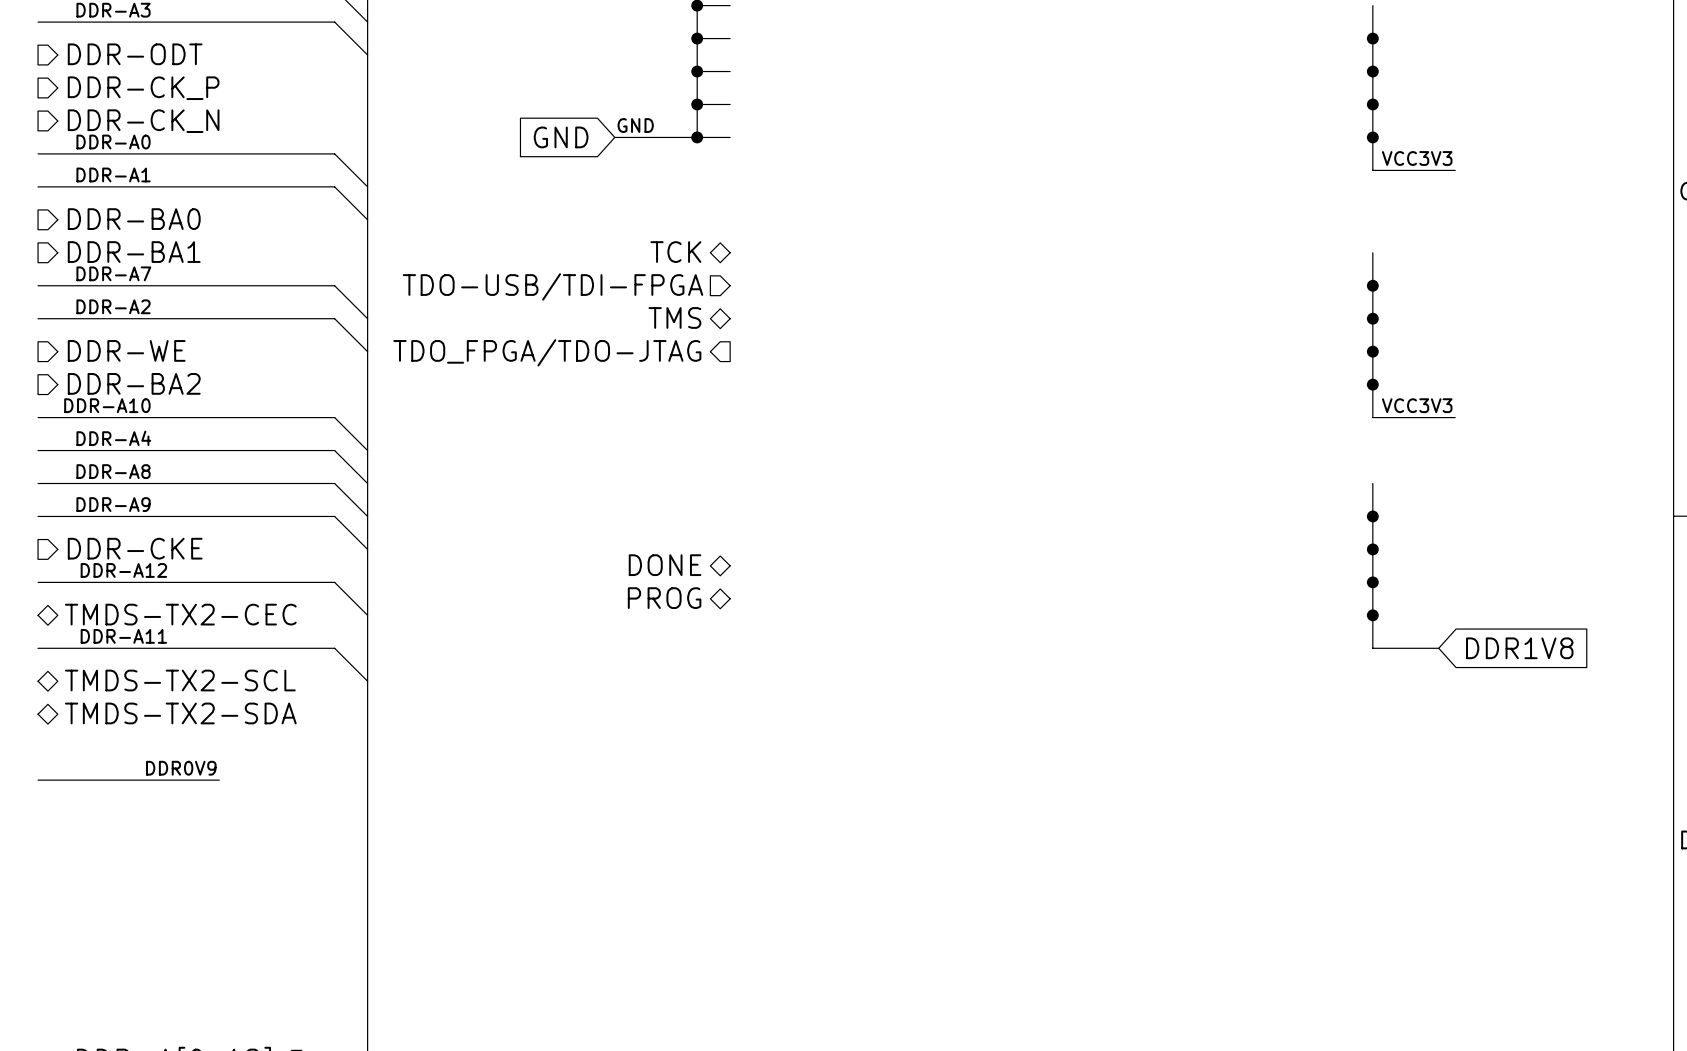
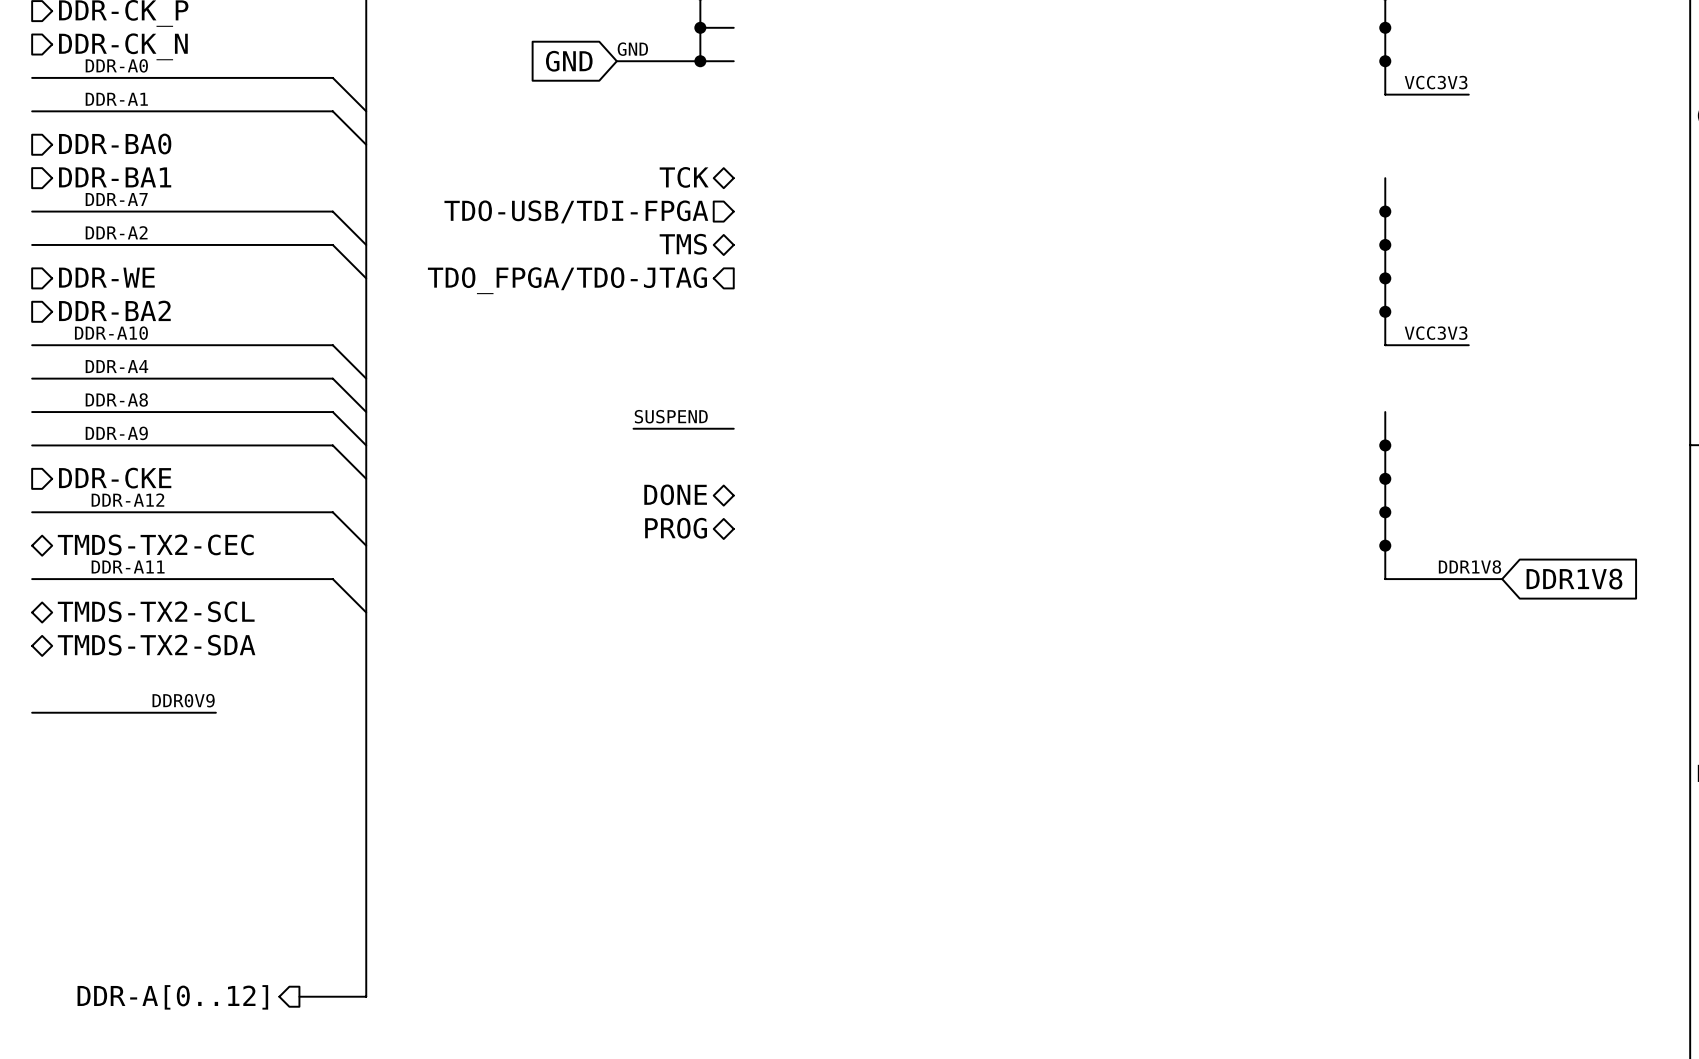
label: none -> SUSPEND (671, 416)
wire: none -> (633, 428) (733, 428)
label: none -> DDR1V8 (1469, 567)
wire: none -> (1452, 579) (1502, 579)
global label position: DDR1V8 (1519, 648) -> DDR1V8 (1574, 579)

